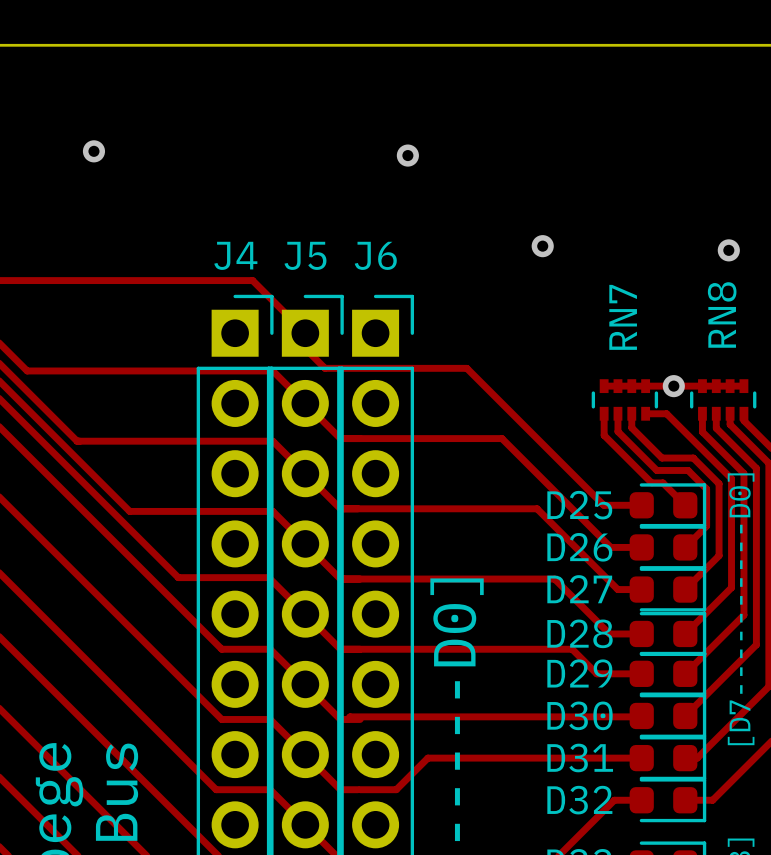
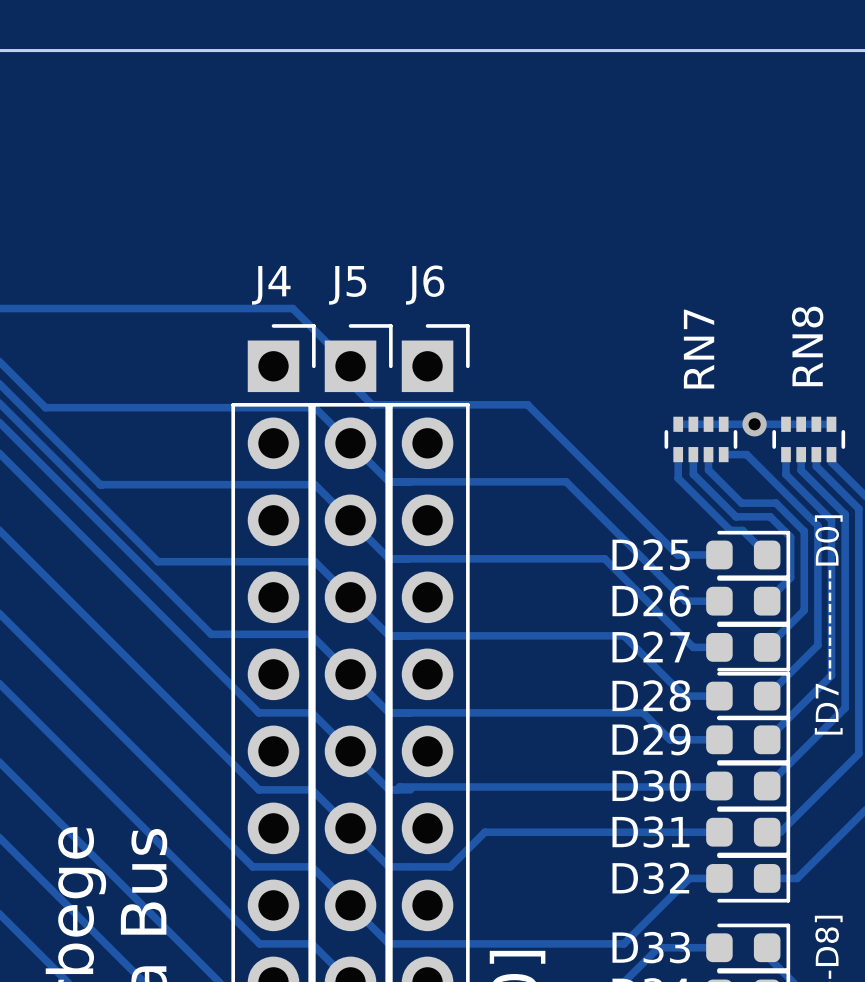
via: (93, 151) -> none
via: (407, 155) -> none
via: (542, 246) -> none
via: (728, 250) -> none

